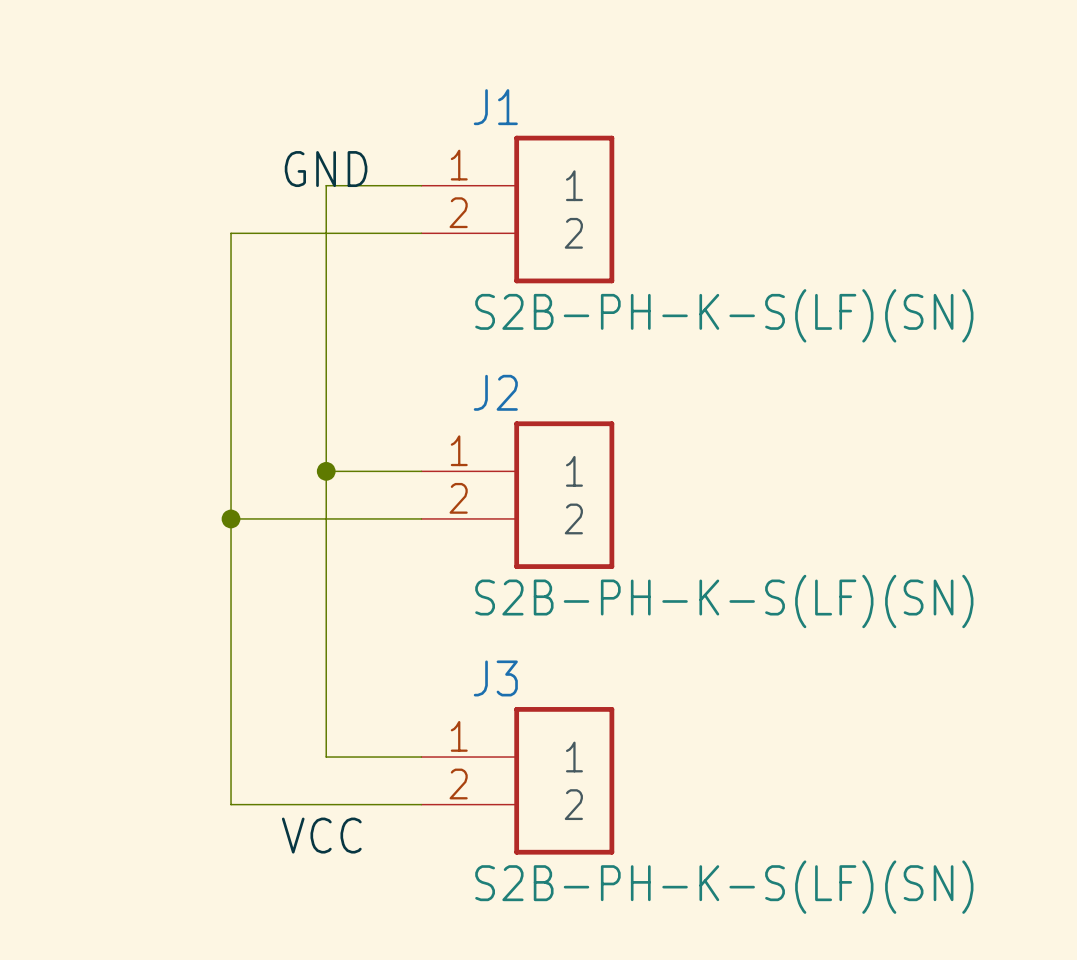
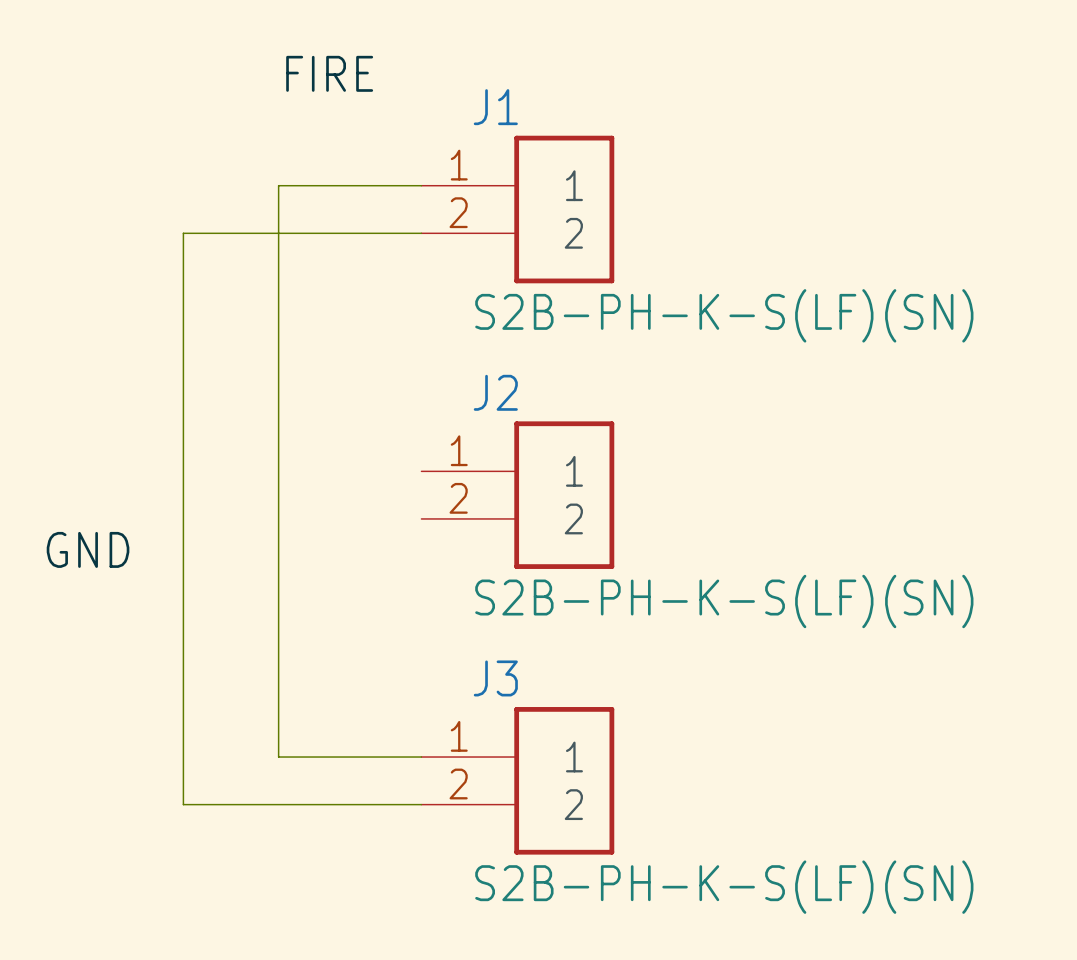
label: none -> FIRE (329, 73)
label position: GND (326, 169) -> GND (88, 549)
wire: (326, 185) (326, 757) -> (326, 185) (278, 185) (278, 757) (326, 757)
wire: (231, 233) (231, 804) -> (231, 233) (183, 233) (183, 804) (231, 804)
wire: (326, 471) (421, 471) -> none
junction: (326, 471) -> none
wire: (231, 518) (421, 518) -> none
junction: (231, 518) -> none
label: VCC (321, 835) -> none

